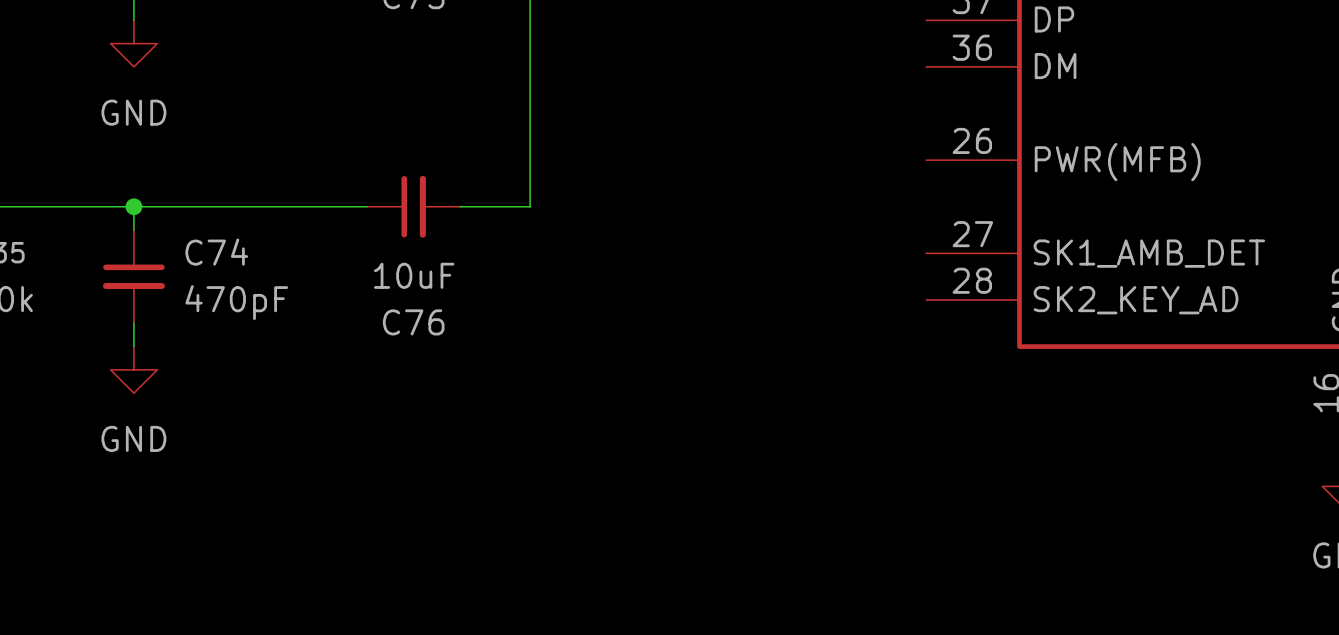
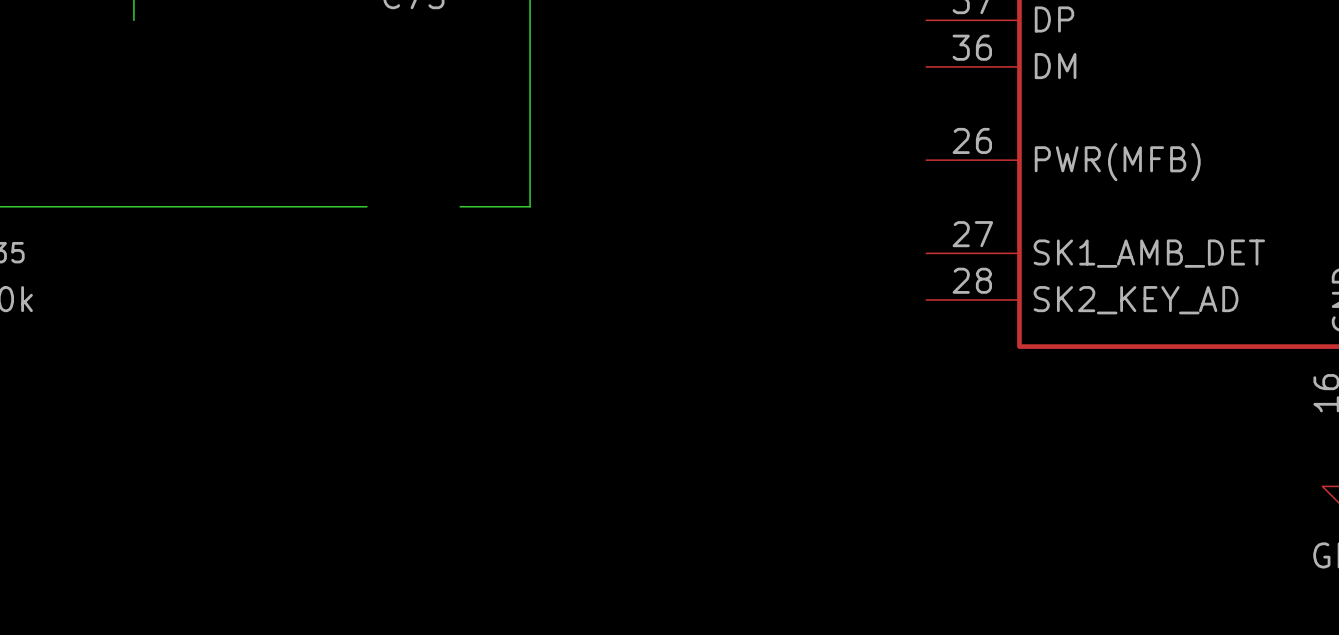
power symbol: GND (133, 43) -> none
wire: (133, 206) (133, 230) -> none
junction: (133, 206) -> none
C76: 10uF (413, 206) -> none
C74: 470pF (133, 276) -> none
wire: (133, 323) (133, 346) -> none
power symbol: GND (133, 369) -> none

